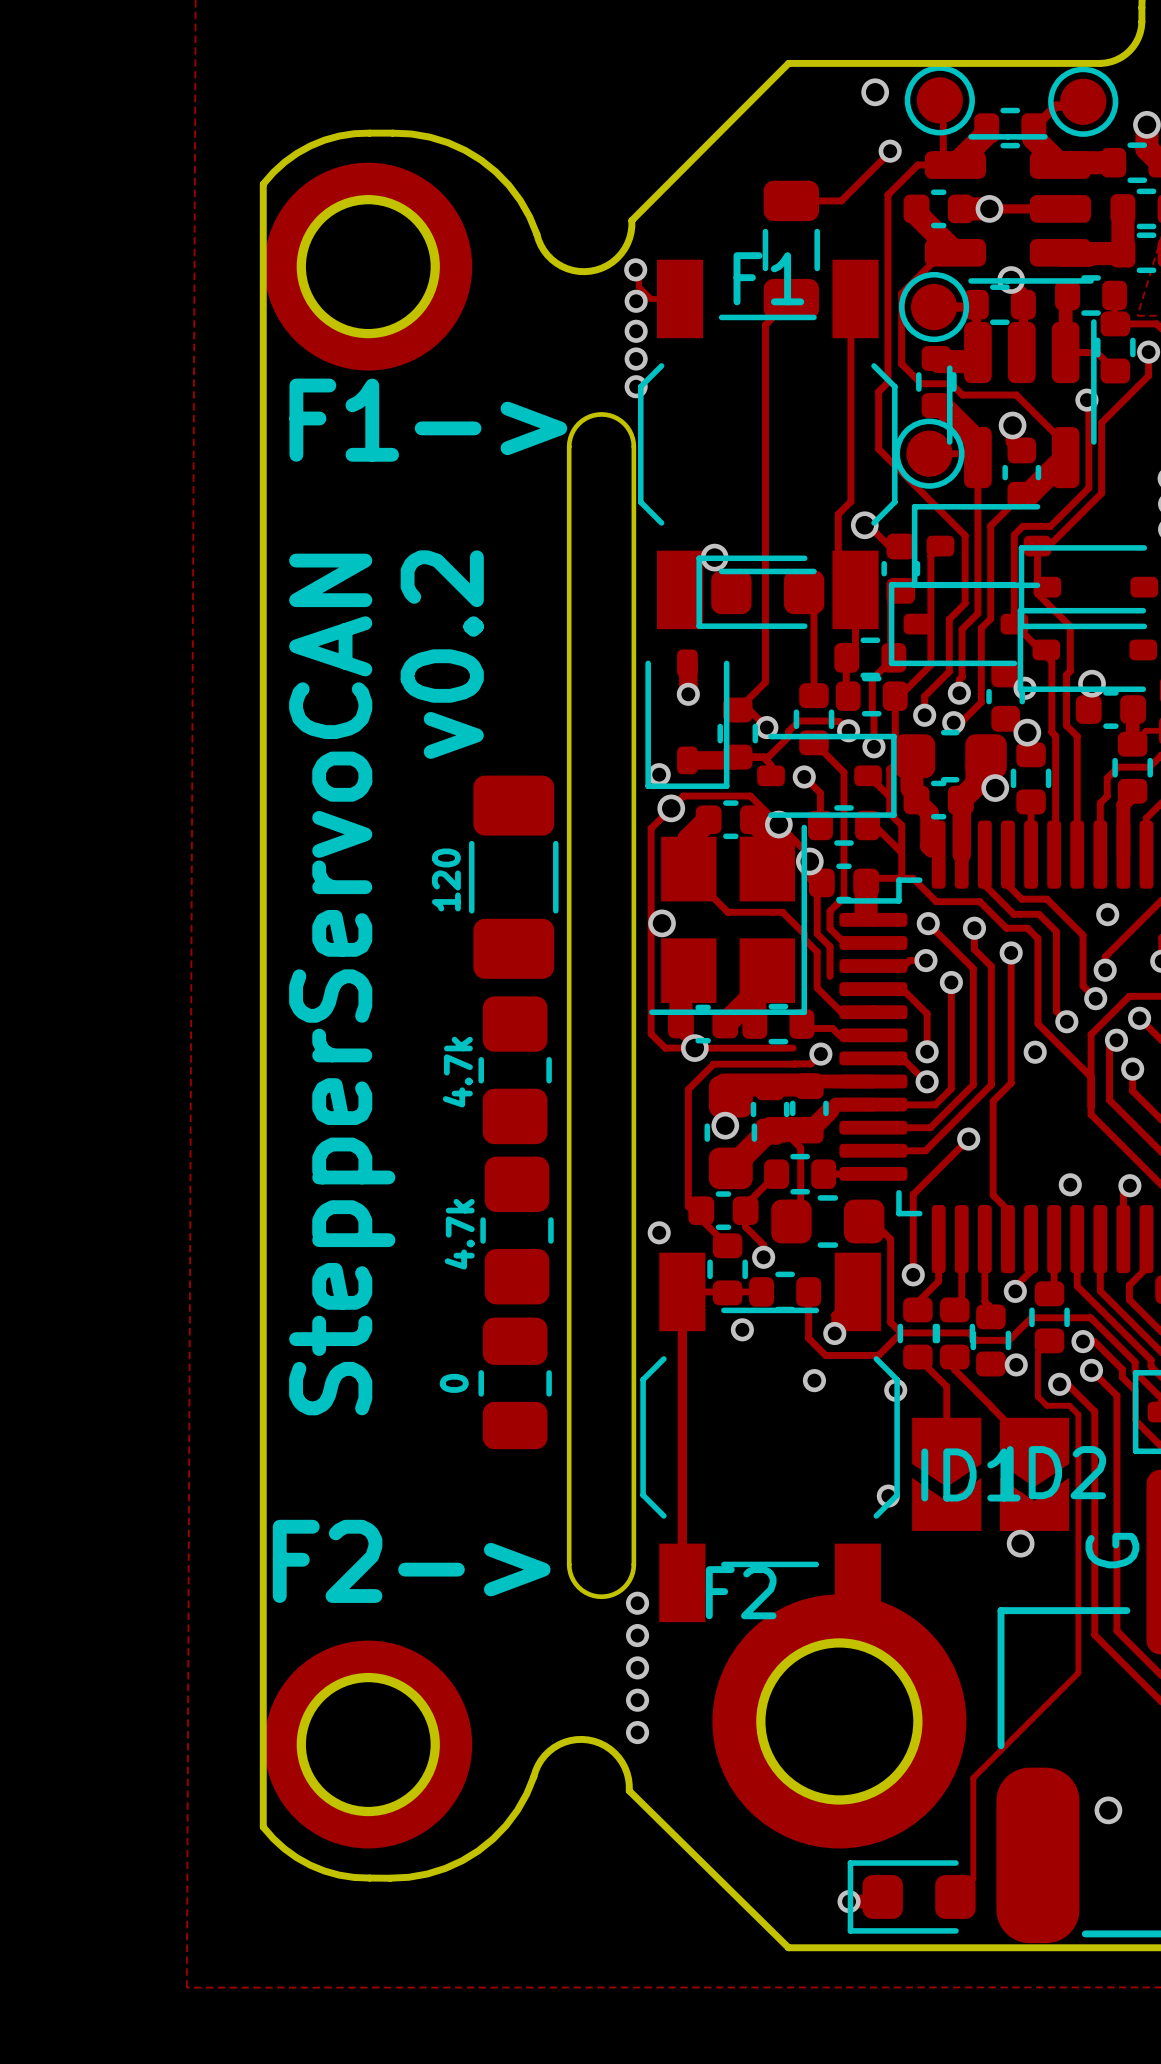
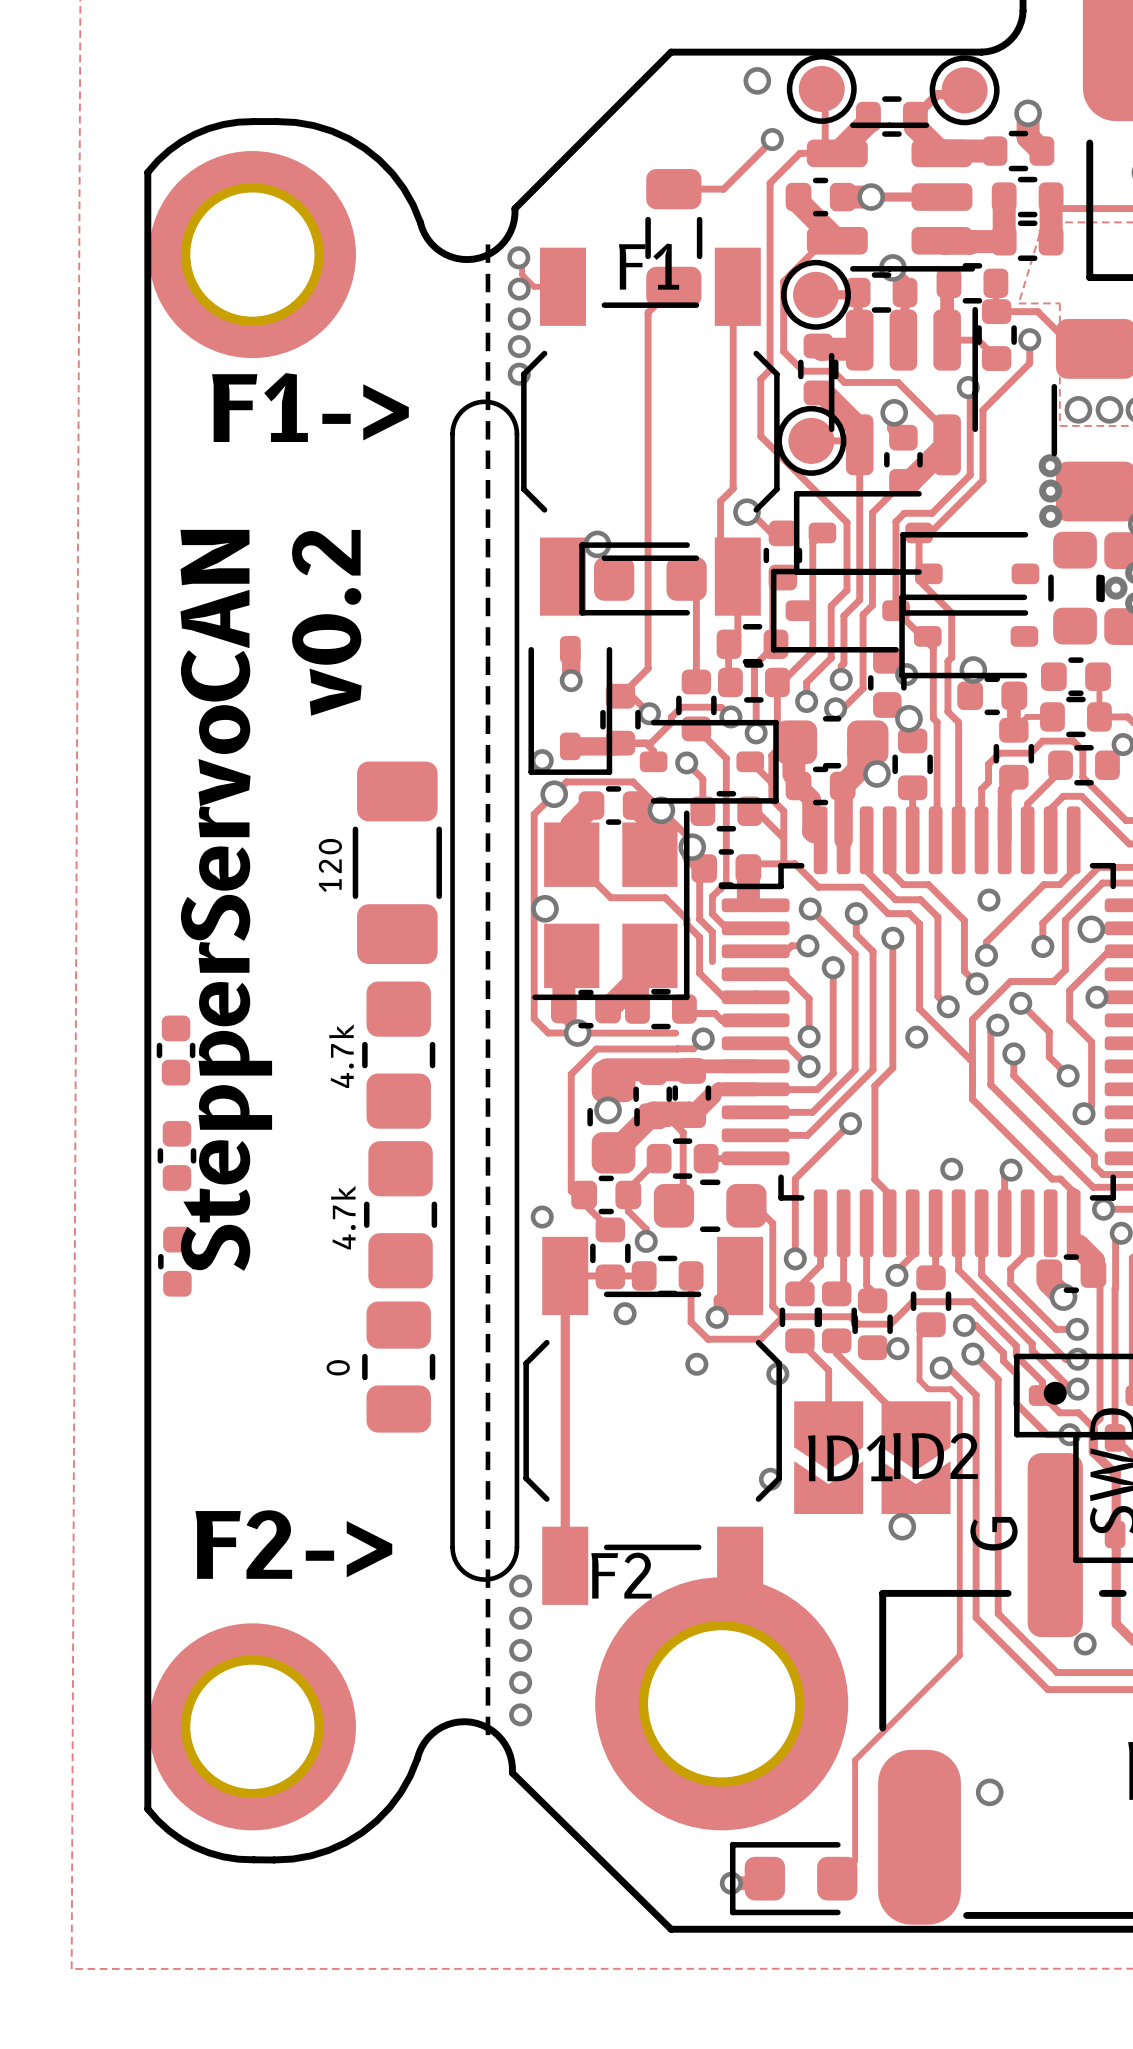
line: none -> (487, 244) (487, 1742)
part: none -> (176, 1050)
part: none -> (176, 1155)
part: none -> (177, 1261)

